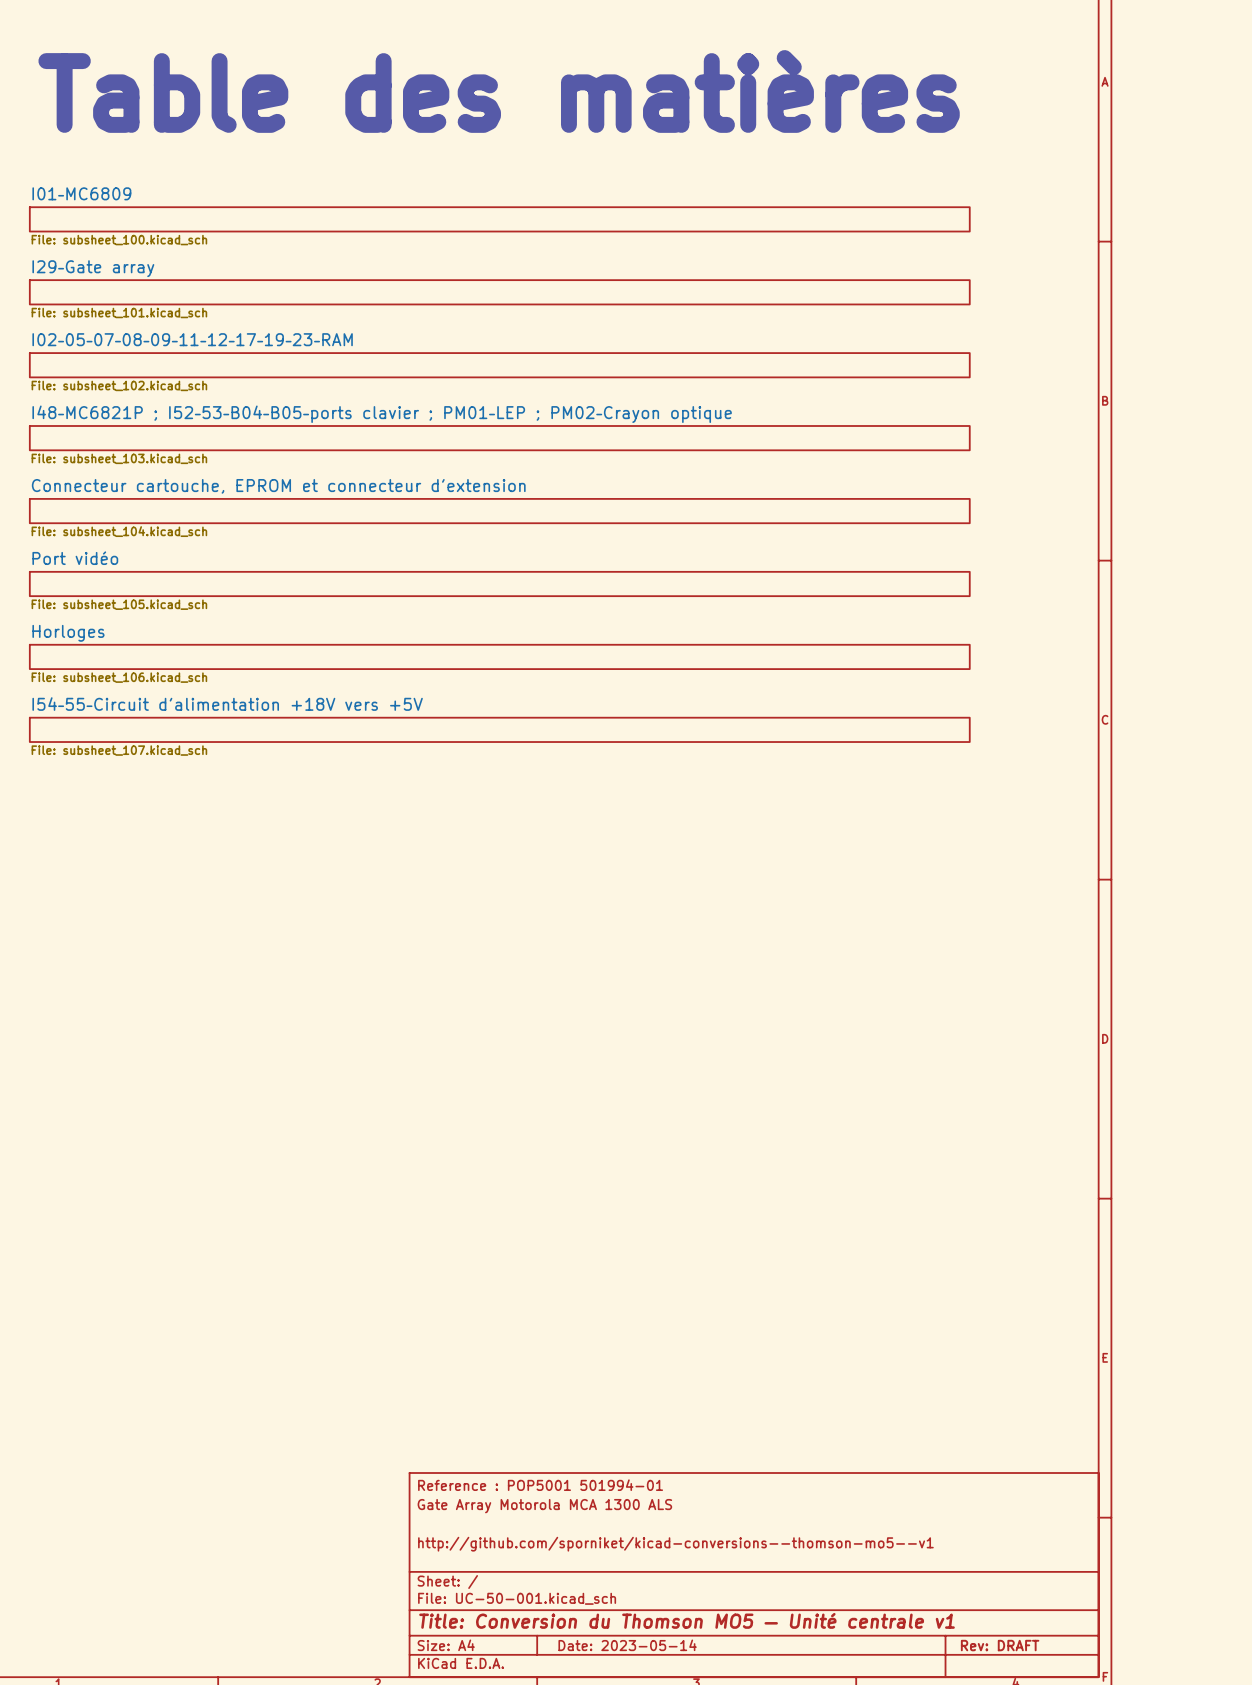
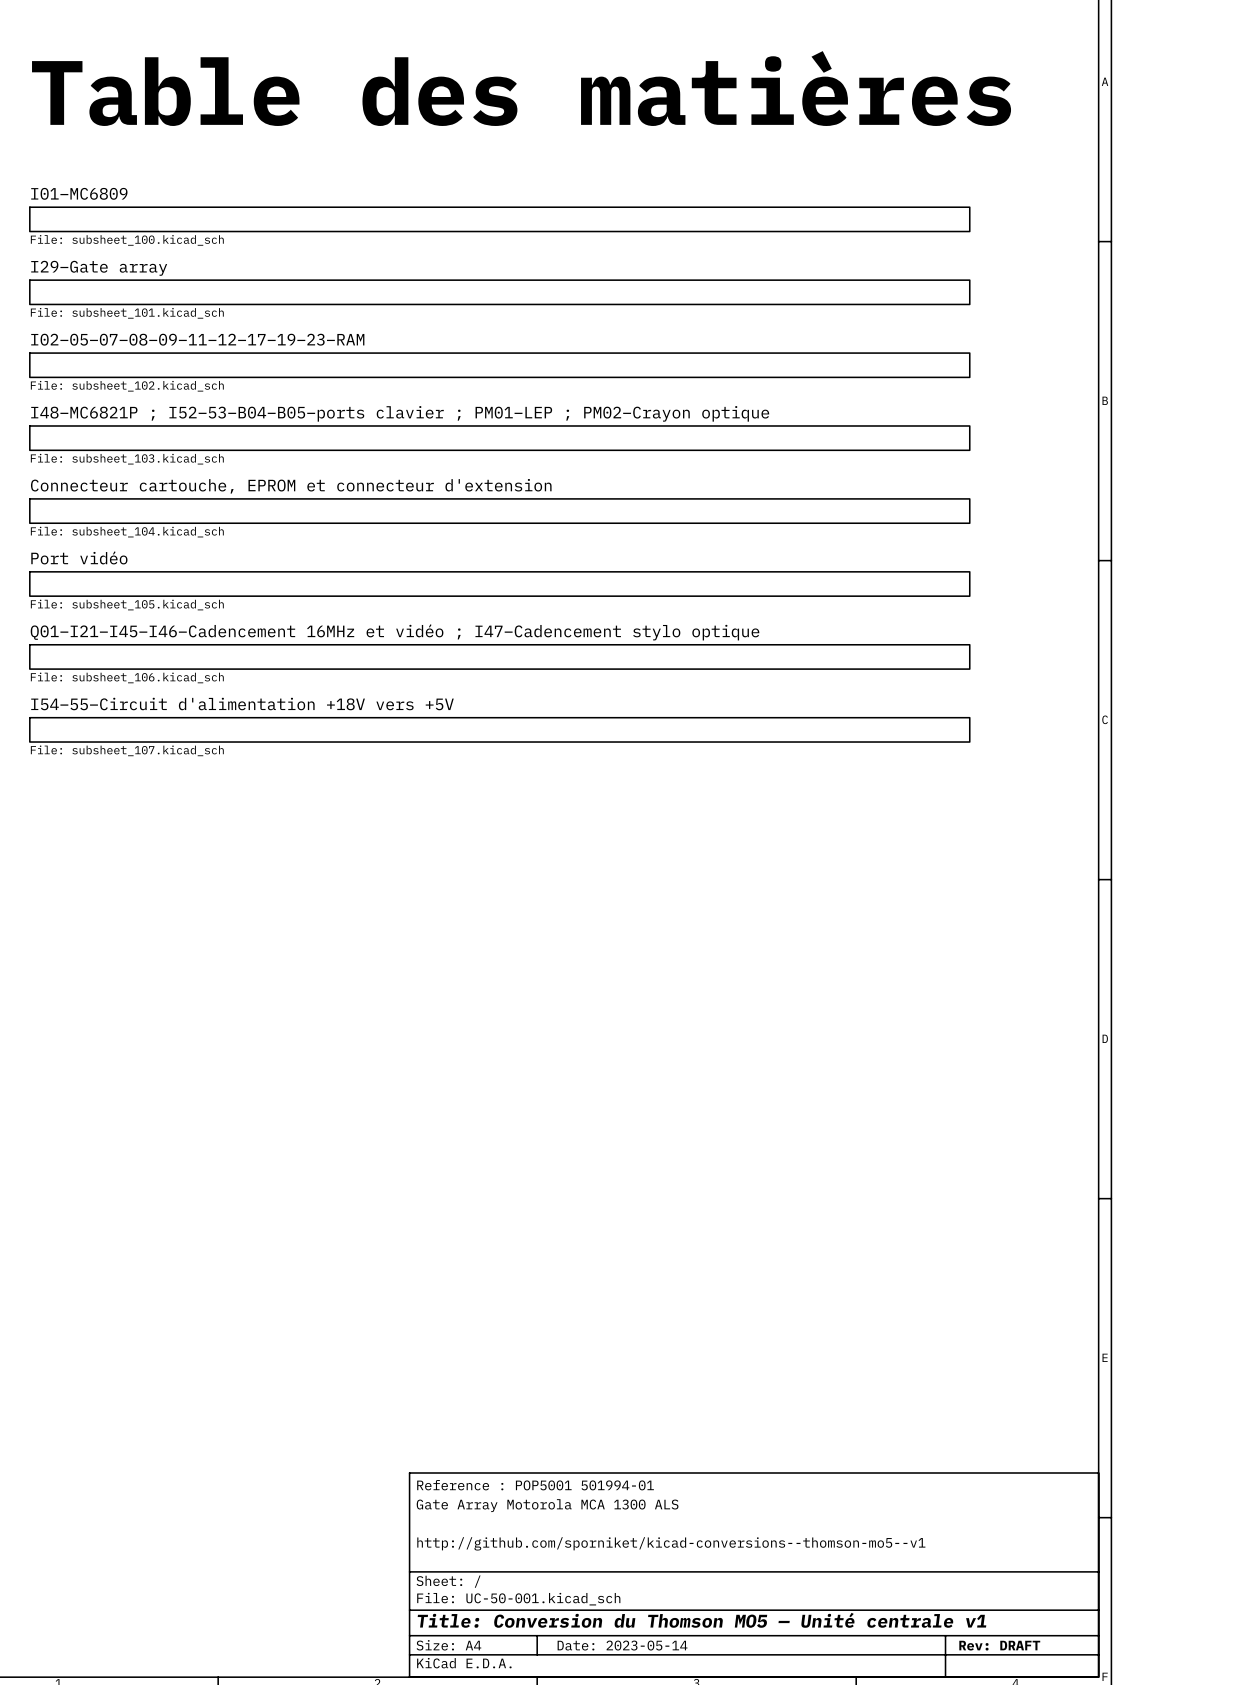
sheet Horloges name: Horloges (68, 633) -> Q01–I21–I45–I46–Cadencement 16MHz et vidéo ; I47–Cadencement stylo optique (395, 632)

